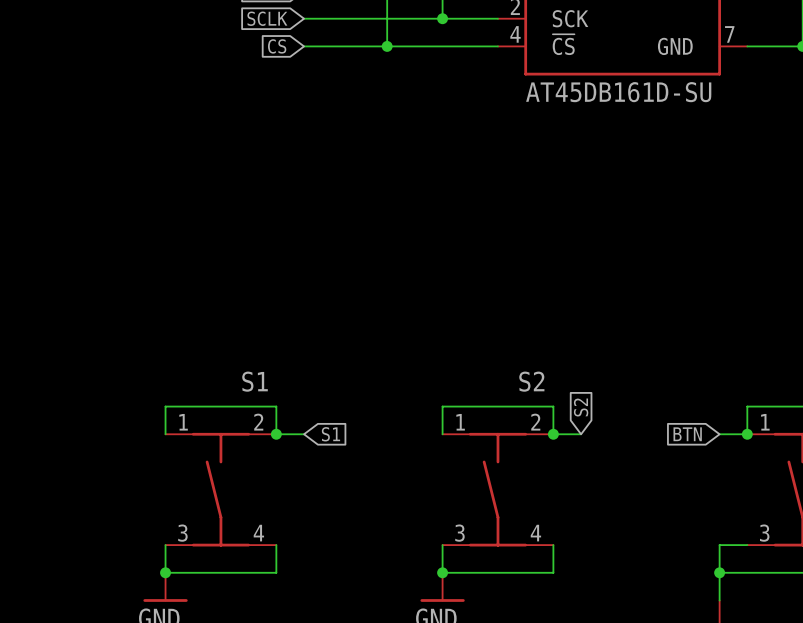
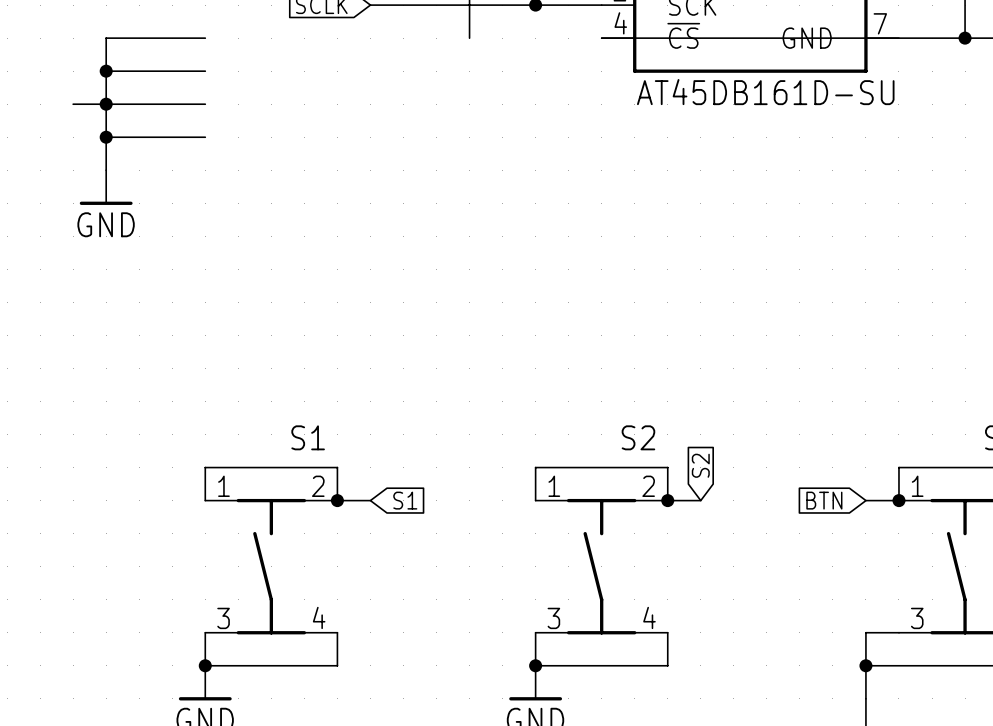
wire: none -> (205, 38) (106, 38) (106, 170)
global label: CS (277, 46) -> none
wire: (304, 46) (497, 46) -> (898, 38) (601, 38)
junction: (387, 46) -> none
wire: none -> (106, 71) (205, 71)
junction: none -> (106, 71)
wire: none -> (73, 104) (205, 104)
junction: none -> (106, 104)
wire: none -> (106, 137) (205, 137)
junction: none -> (106, 137)
power symbol: none -> GND (106, 187)

